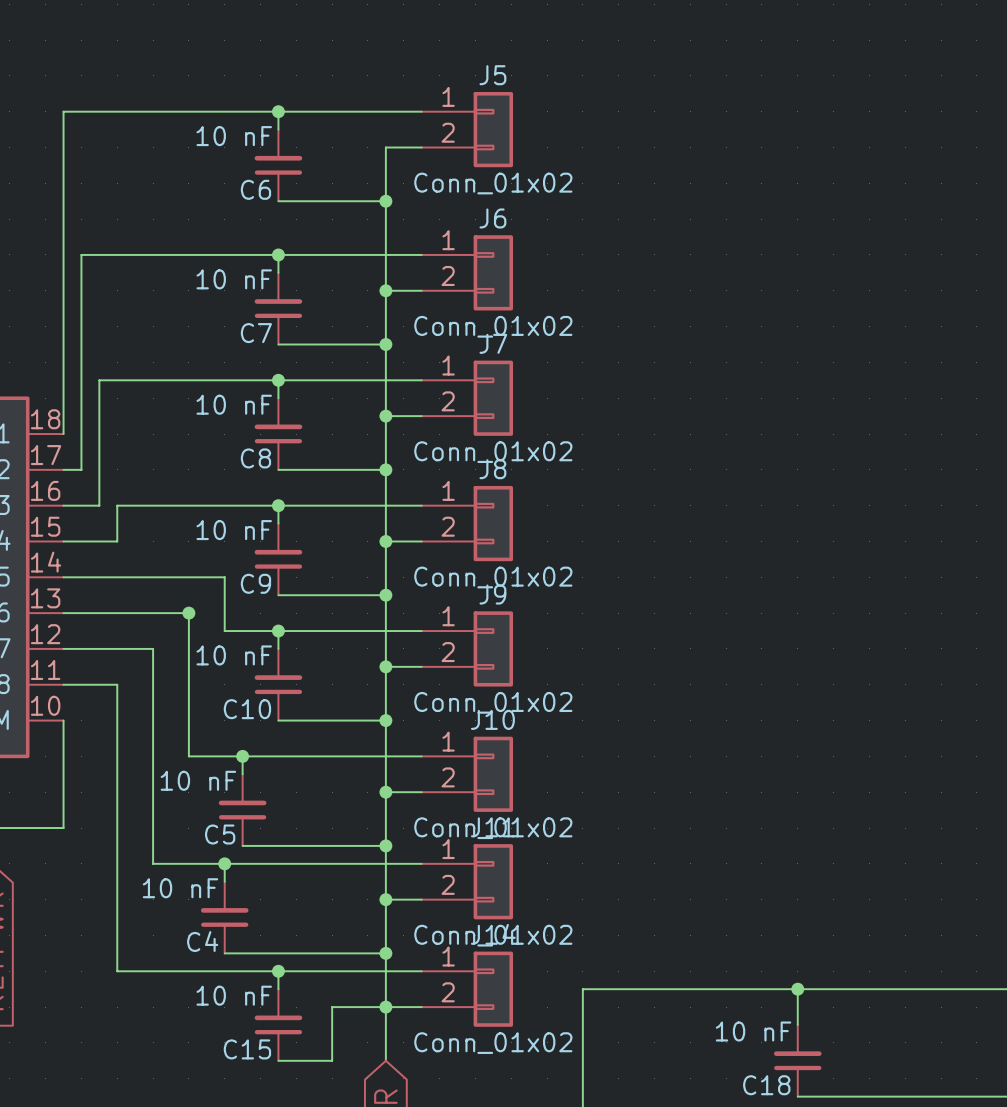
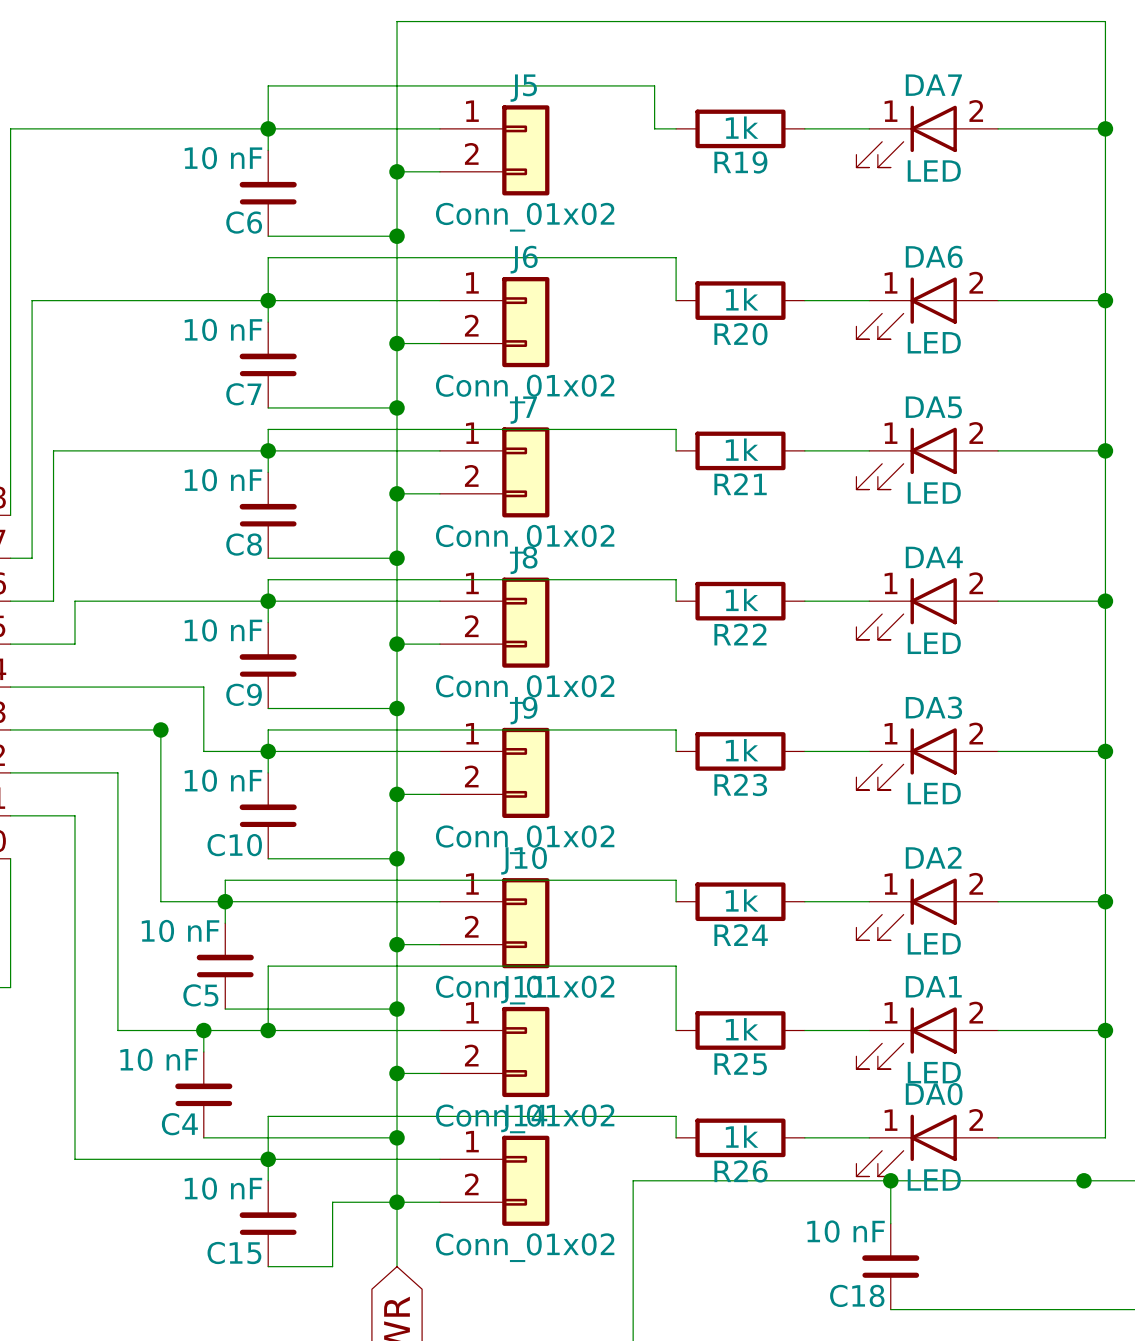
wire: none -> (268, 128) (268, 85) (654, 85) (654, 128) (676, 128)
R19: none -> 1k (740, 128)
wire: none -> (804, 128) (869, 128)
wire: none -> (998, 128) (1105, 128)
junction: none -> (1105, 128)
DA7: none -> LED (927, 136)
wire: none -> (397, 171) (397, 21) (1105, 21) (1105, 1137) (998, 1137)
junction: none -> (397, 171)
wire: none -> (268, 300) (268, 257) (676, 257) (676, 300)
R20: none -> 1k (740, 300)
wire: none -> (804, 300) (869, 300)
wire: none -> (998, 300) (1105, 300)
junction: none -> (1105, 300)
DA6: none -> LED (927, 308)
wire: none -> (268, 450) (268, 429) (676, 429) (676, 450)
R21: none -> 1k (740, 450)
wire: none -> (804, 450) (869, 450)
wire: none -> (998, 450) (1105, 450)
junction: none -> (1105, 450)
DA5: none -> LED (927, 458)
wire: none -> (268, 601) (268, 579) (676, 579) (676, 601)
R22: none -> 1k (740, 601)
wire: none -> (804, 601) (869, 601)
wire: none -> (998, 601) (1105, 601)
junction: none -> (1105, 601)
DA4: none -> LED (927, 608)
wire: none -> (268, 751) (268, 729) (676, 729) (676, 751)
R23: none -> 1k (740, 751)
wire: none -> (804, 751) (869, 751)
wire: none -> (998, 751) (1105, 751)
junction: none -> (1105, 751)
DA3: none -> LED (927, 759)
wire: none -> (225, 901) (225, 880) (676, 880) (676, 901)
R24: none -> 1k (740, 901)
wire: none -> (804, 901) (869, 901)
wire: none -> (998, 901) (1105, 901)
junction: none -> (1105, 901)
DA2: none -> LED (927, 909)
wire: none -> (268, 1030) (268, 966) (676, 966) (676, 1030)
junction: none -> (268, 1030)
R25: none -> 1k (740, 1030)
wire: none -> (804, 1030) (869, 1030)
wire: none -> (998, 1030) (1105, 1030)
junction: none -> (1105, 1030)
DA1: none -> LED (927, 1038)
wire: none -> (676, 1137) (676, 1116) (268, 1116) (268, 1159)
R26: none -> 1k (740, 1137)
wire: none -> (804, 1137) (869, 1137)
DA0: none -> LED (927, 1145)
junction: none -> (1083, 1180)

